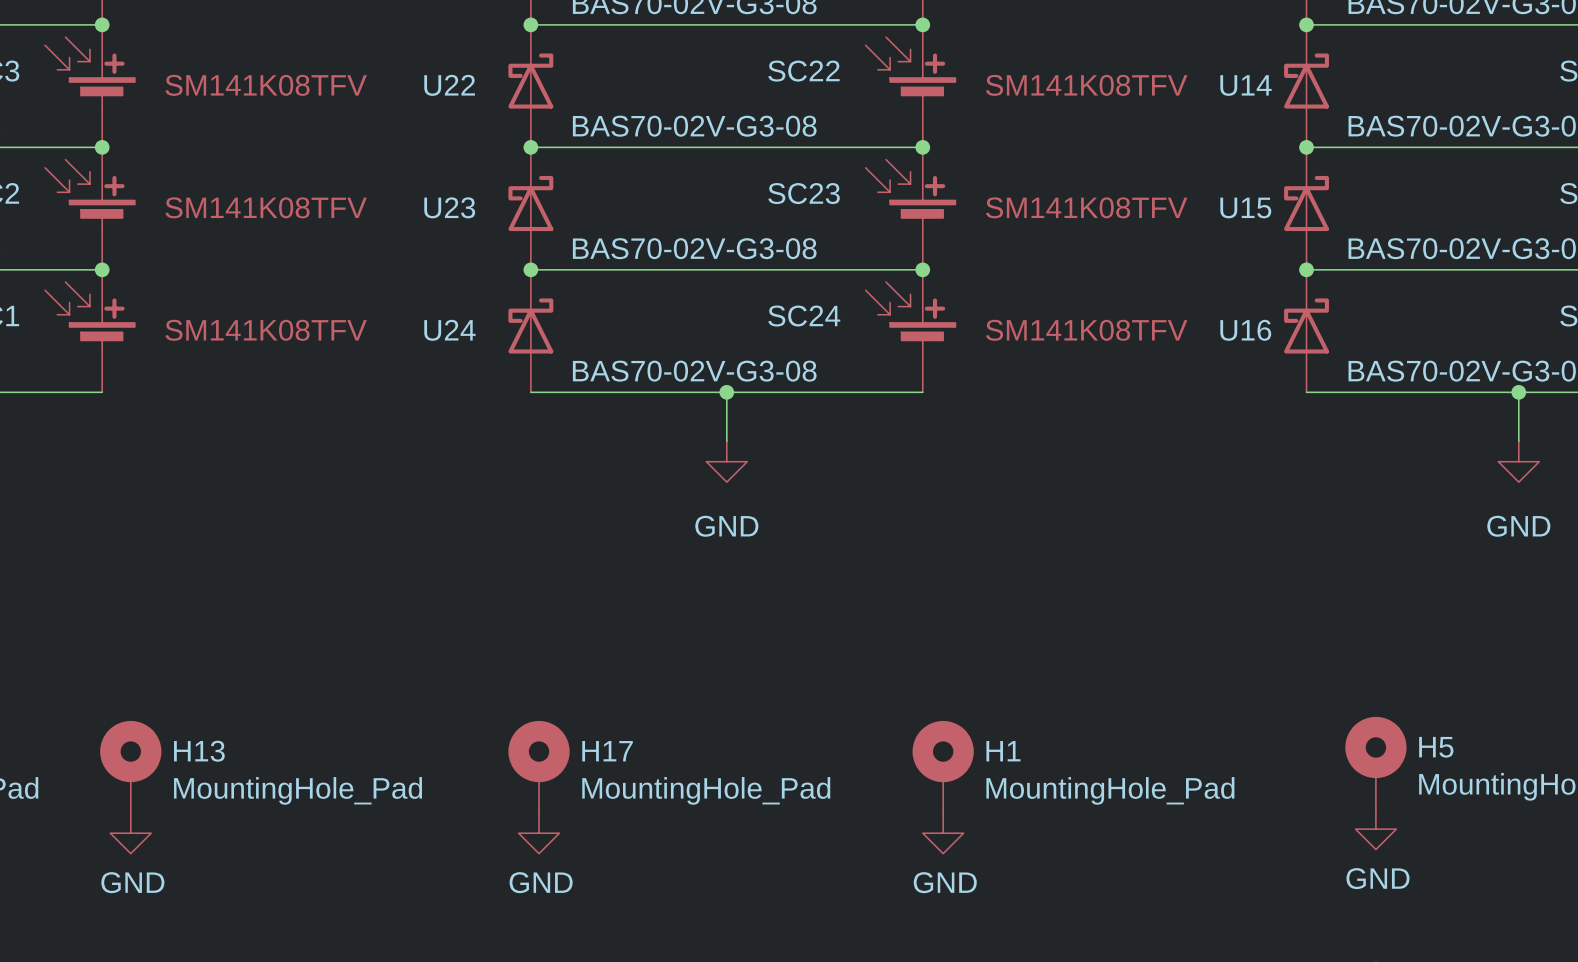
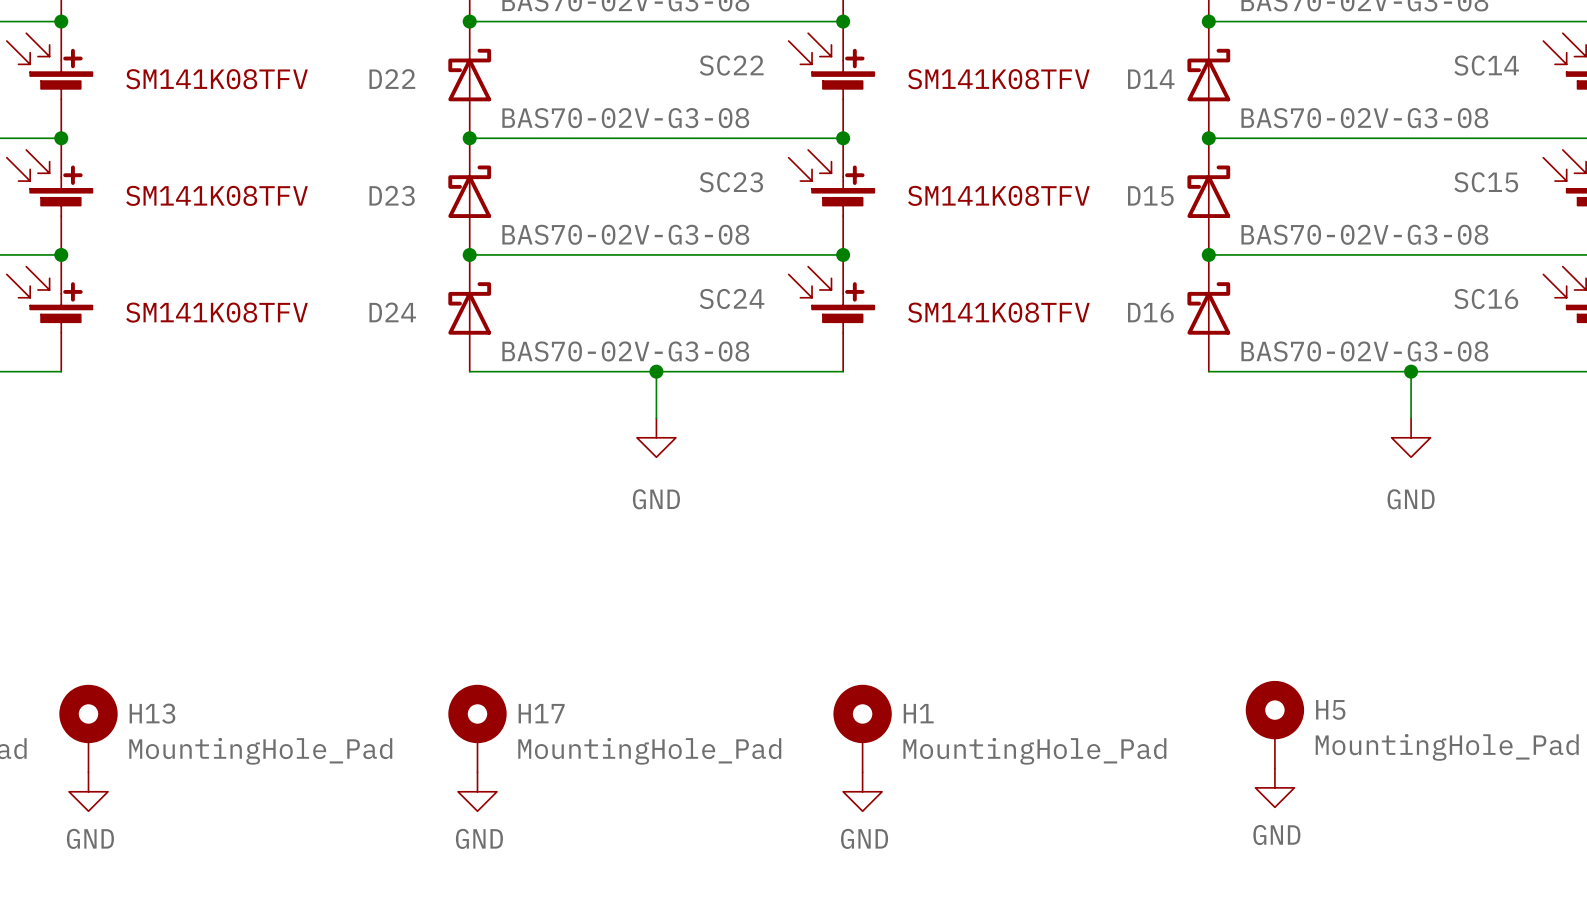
U22 name: U22 (449, 85) -> D22 (392, 79)
U14 name: U14 (1245, 85) -> D14 (1151, 79)
U23 name: U23 (449, 207) -> D23 (392, 195)
U15 name: U15 (1245, 207) -> D15 (1150, 196)
U24 name: U24 (449, 330) -> D24 (392, 312)
U16 name: U16 (1245, 330) -> D16 (1150, 312)

